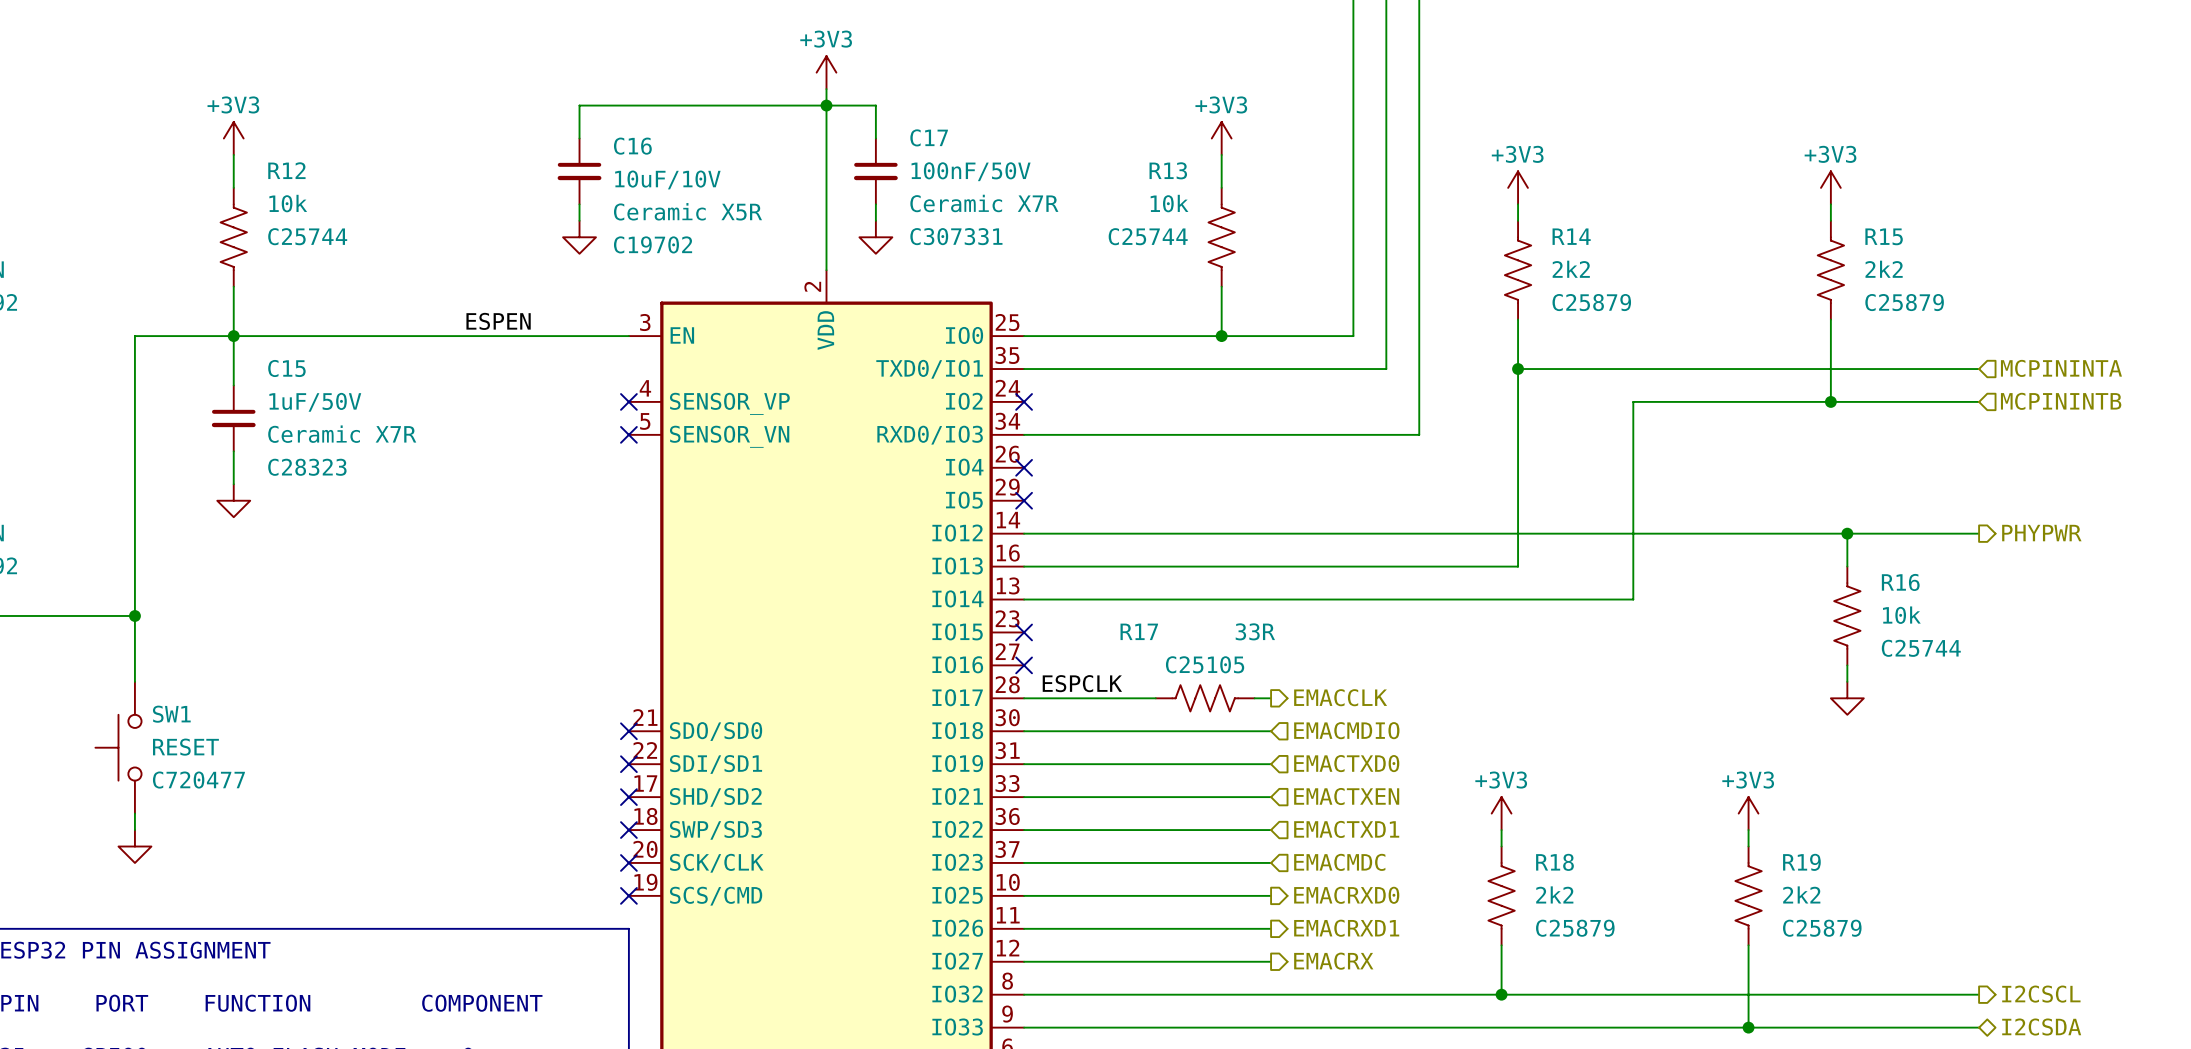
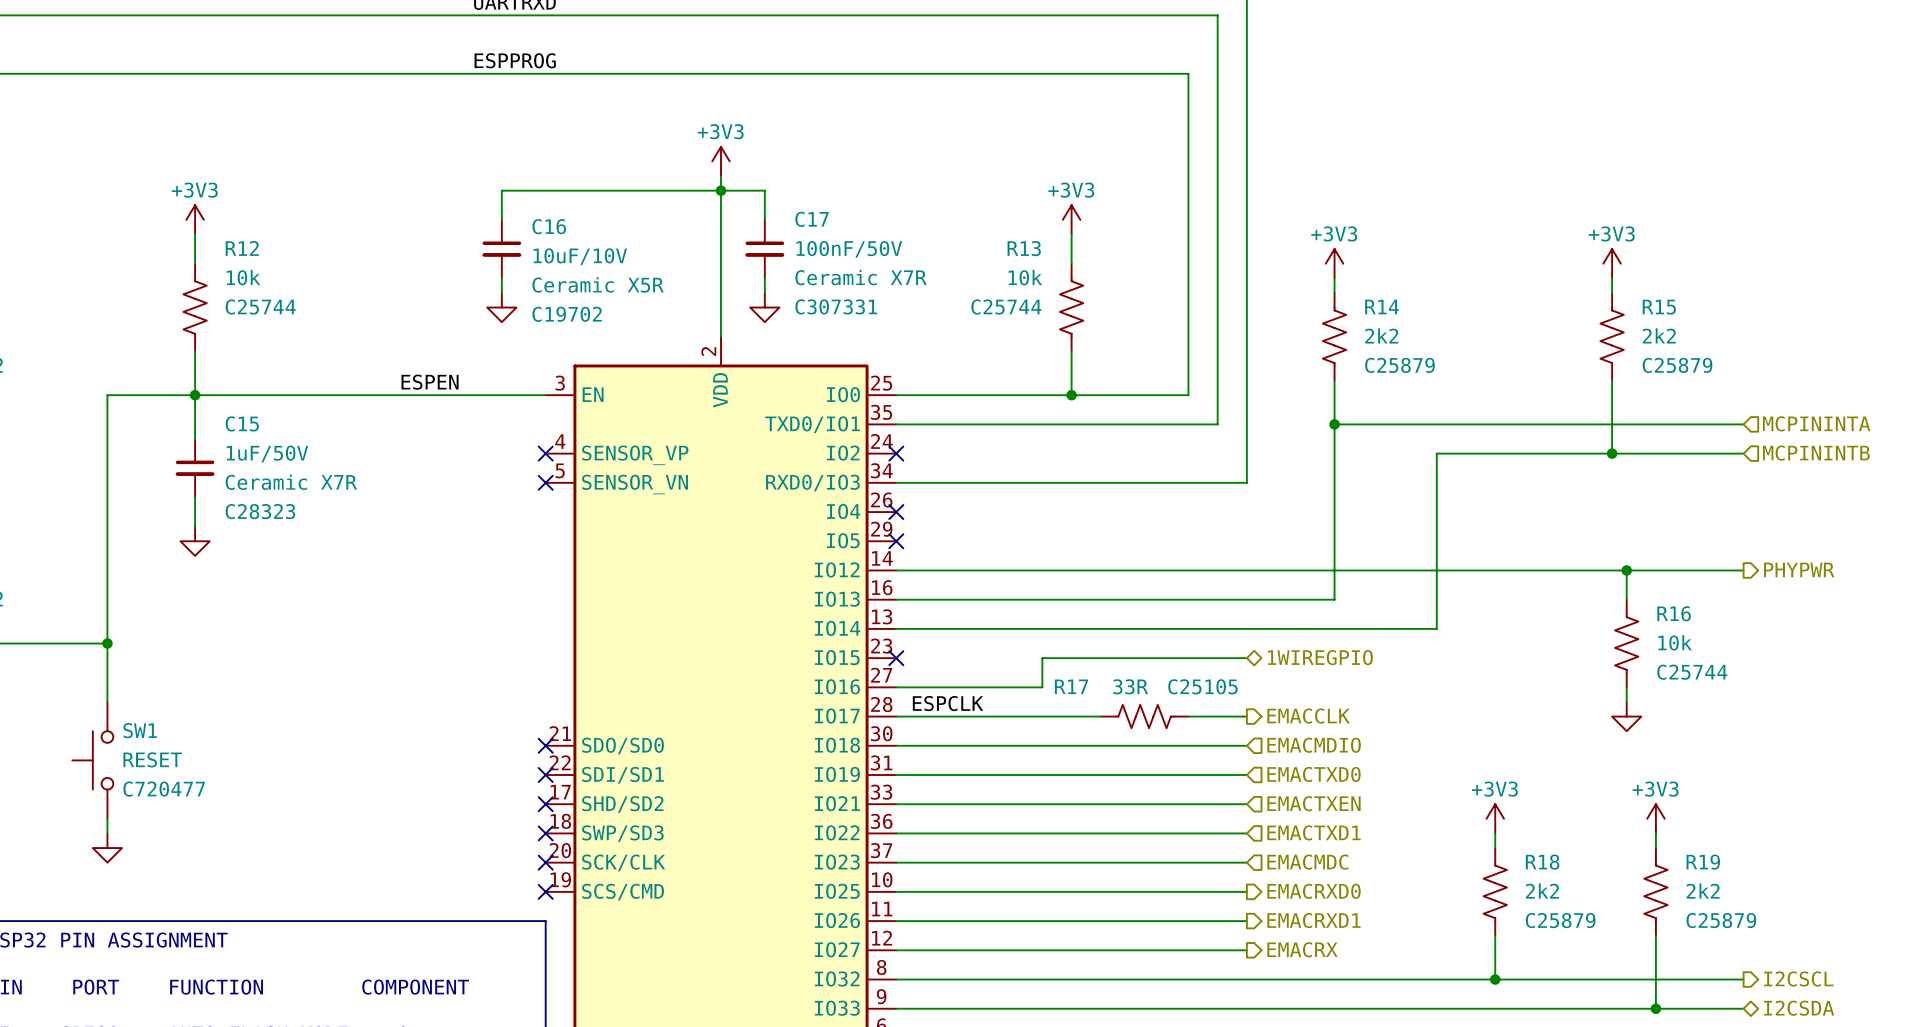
R17 name position: R17 (1139, 631) -> R17 (1071, 686)
R17 value position: 33R (1255, 631) -> 33R (1130, 686)
hierarchical label: none -> 1WIREGPIO (1320, 657)
wire: none -> (1246, 658) (1042, 658) (1042, 687) (896, 687)
R17 text position: C25105 (1205, 664) -> C25105 (1202, 686)
no-connect mark: (1024, 665) -> none
hierarchical label position: EMACCLK (1340, 697) -> EMACCLK (1308, 716)
R17 position: (1205, 698) -> (1144, 716)
wire: none -> (1188, 716) (1246, 716)
hierarchical label position: EMACMDIO (1346, 730) -> EMACMDIO (1314, 745)
wire: none -> (1115, 745) (1246, 745)
hierarchical label position: EMACTXD0 (1346, 763) -> EMACTXD0 (1314, 774)
wire: none -> (1115, 775) (1246, 775)
hierarchical label position: EMACTXEN (1346, 796) -> EMACTXEN (1313, 803)
wire: none -> (1115, 804) (1246, 804)
power symbol: +3V3 (1501, 813) -> none
power symbol position: +3V3 (1748, 813) -> +3V3 (1495, 818)
power symbol: none -> +3V3 (1655, 818)
hierarchical label position: EMACTXD1 (1346, 829) -> EMACTXD1 (1313, 832)
wire: none -> (1115, 833) (1246, 833)
wire: (1501, 830) (1501, 846) -> (1495, 833) (1495, 848)
wire: (1748, 830) (1748, 846) -> (1655, 833) (1655, 848)
wire: none -> (1115, 862) (1246, 862)
hierarchical label position: EMACMDC (1339, 862) -> EMACMDC (1307, 862)
wire: none -> (1115, 891) (1246, 891)
hierarchical label position: EMACRXD0 (1346, 895) -> EMACRXD0 (1314, 891)
R18 position: (1501, 895) -> (1495, 891)
R19 position: (1748, 895) -> (1655, 891)
wire: none -> (1115, 921) (1246, 921)
hierarchical label position: EMACRXD1 (1346, 928) -> EMACRXD1 (1313, 920)
wire: (1501, 945) (1501, 994) -> (1495, 935) (1495, 979)
wire: (1748, 945) (1748, 1027) -> (1655, 935) (1655, 1008)
wire: none -> (1115, 950) (1246, 950)
hierarchical label position: EMACRX (1333, 961) -> EMACRX (1302, 949)
junction: (1501, 994) -> none
junction position: (1748, 1027) -> (1495, 979)
junction: none -> (1655, 1008)

